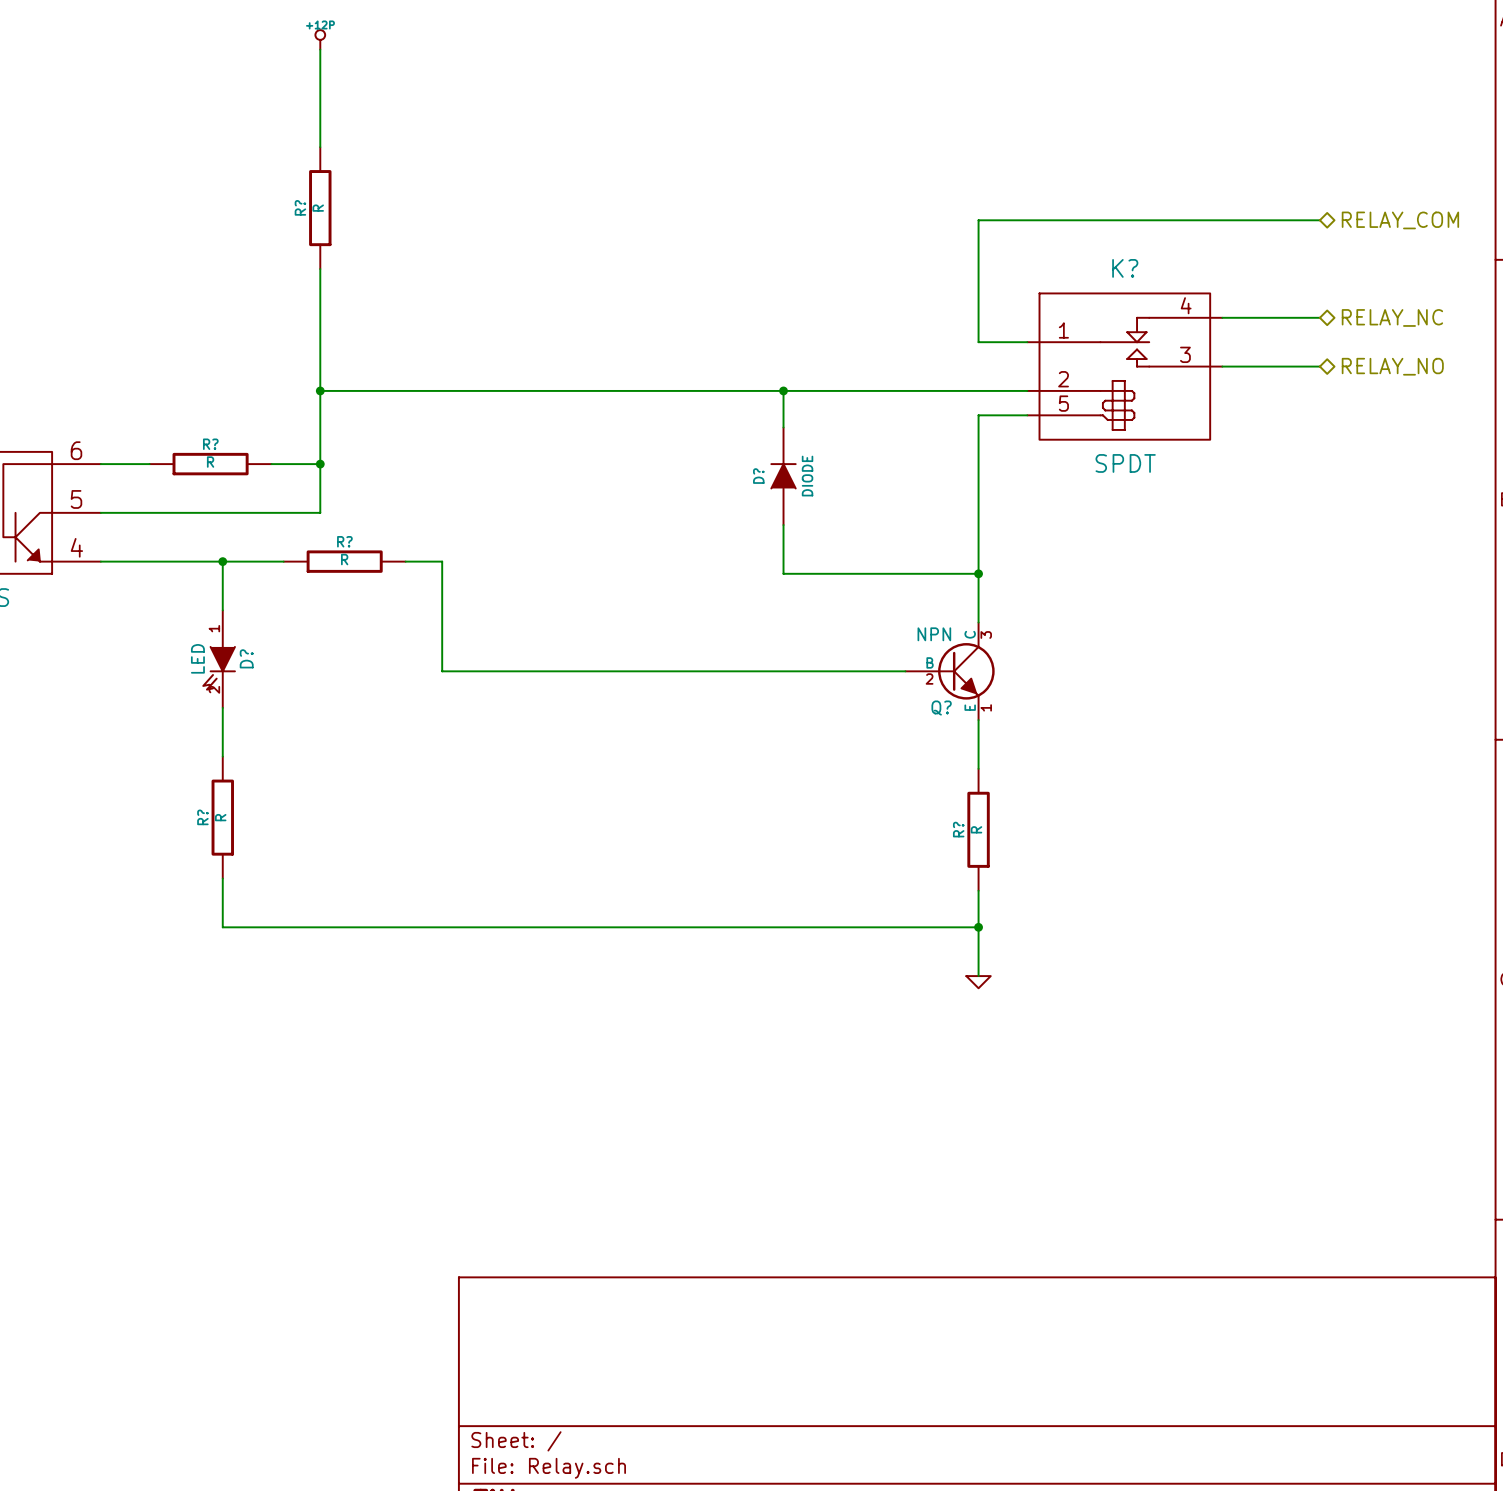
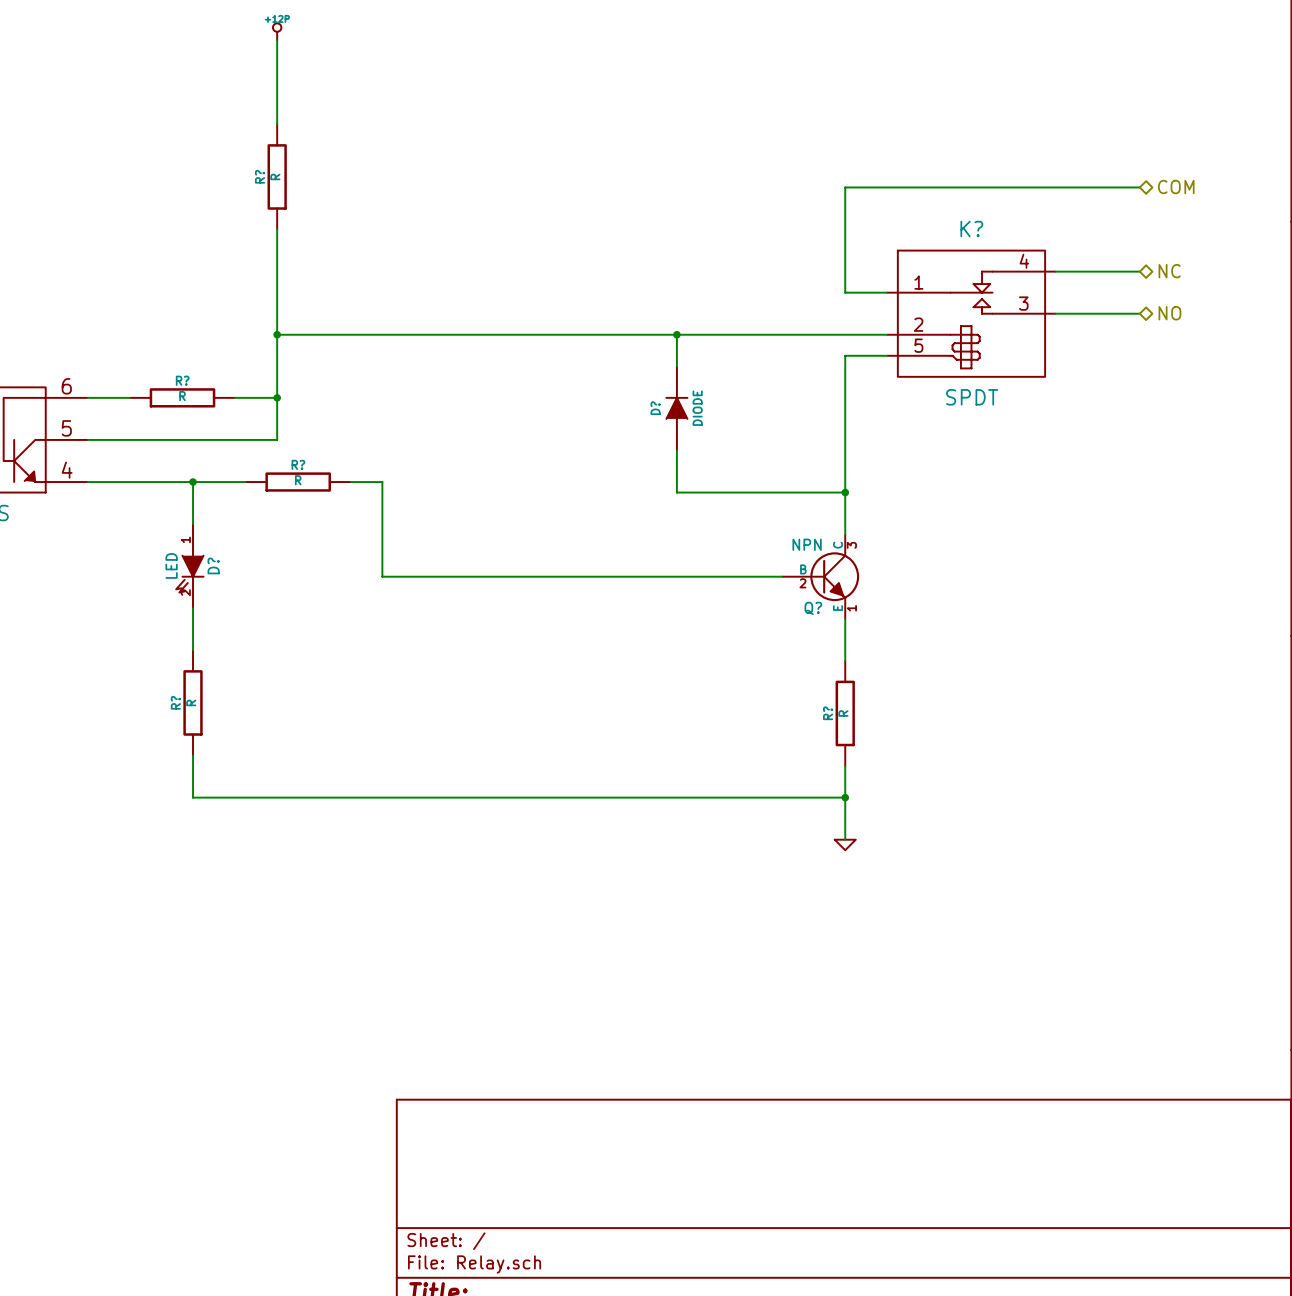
hierarchical label: RELAY_COM (1400, 220) -> COM (1176, 187)
hierarchical label: RELAY_NC (1392, 317) -> NC (1169, 271)
hierarchical label: RELAY_NO (1392, 366) -> NO (1169, 313)

